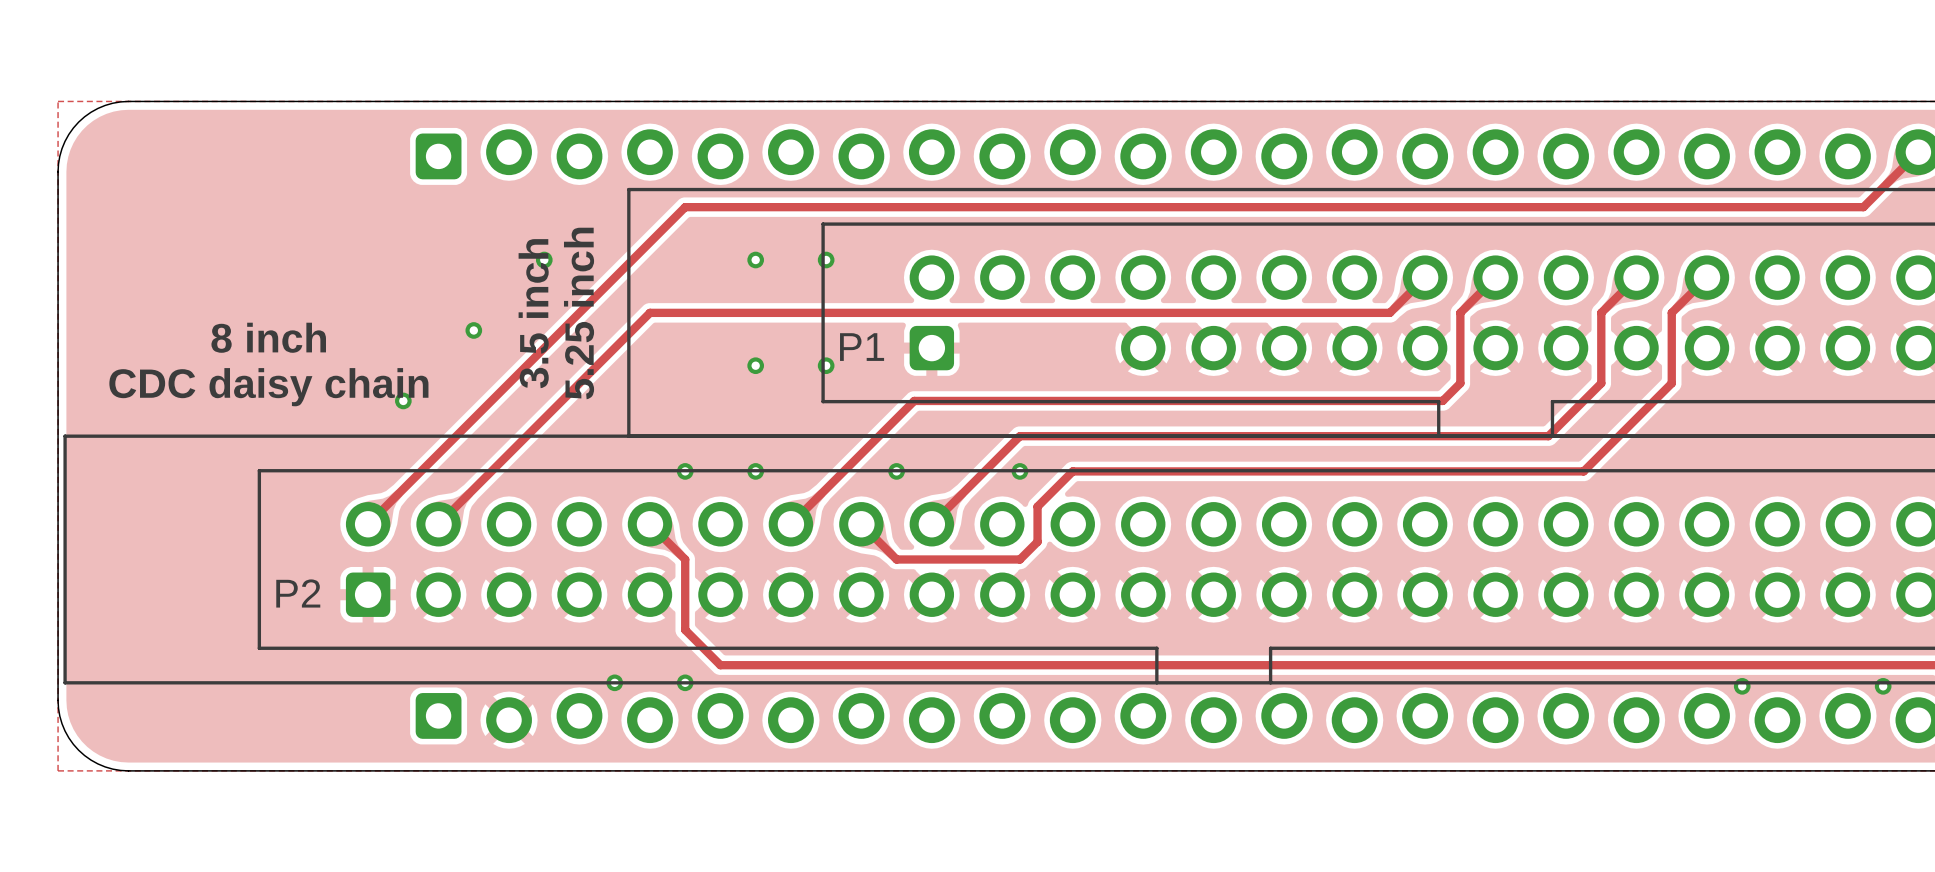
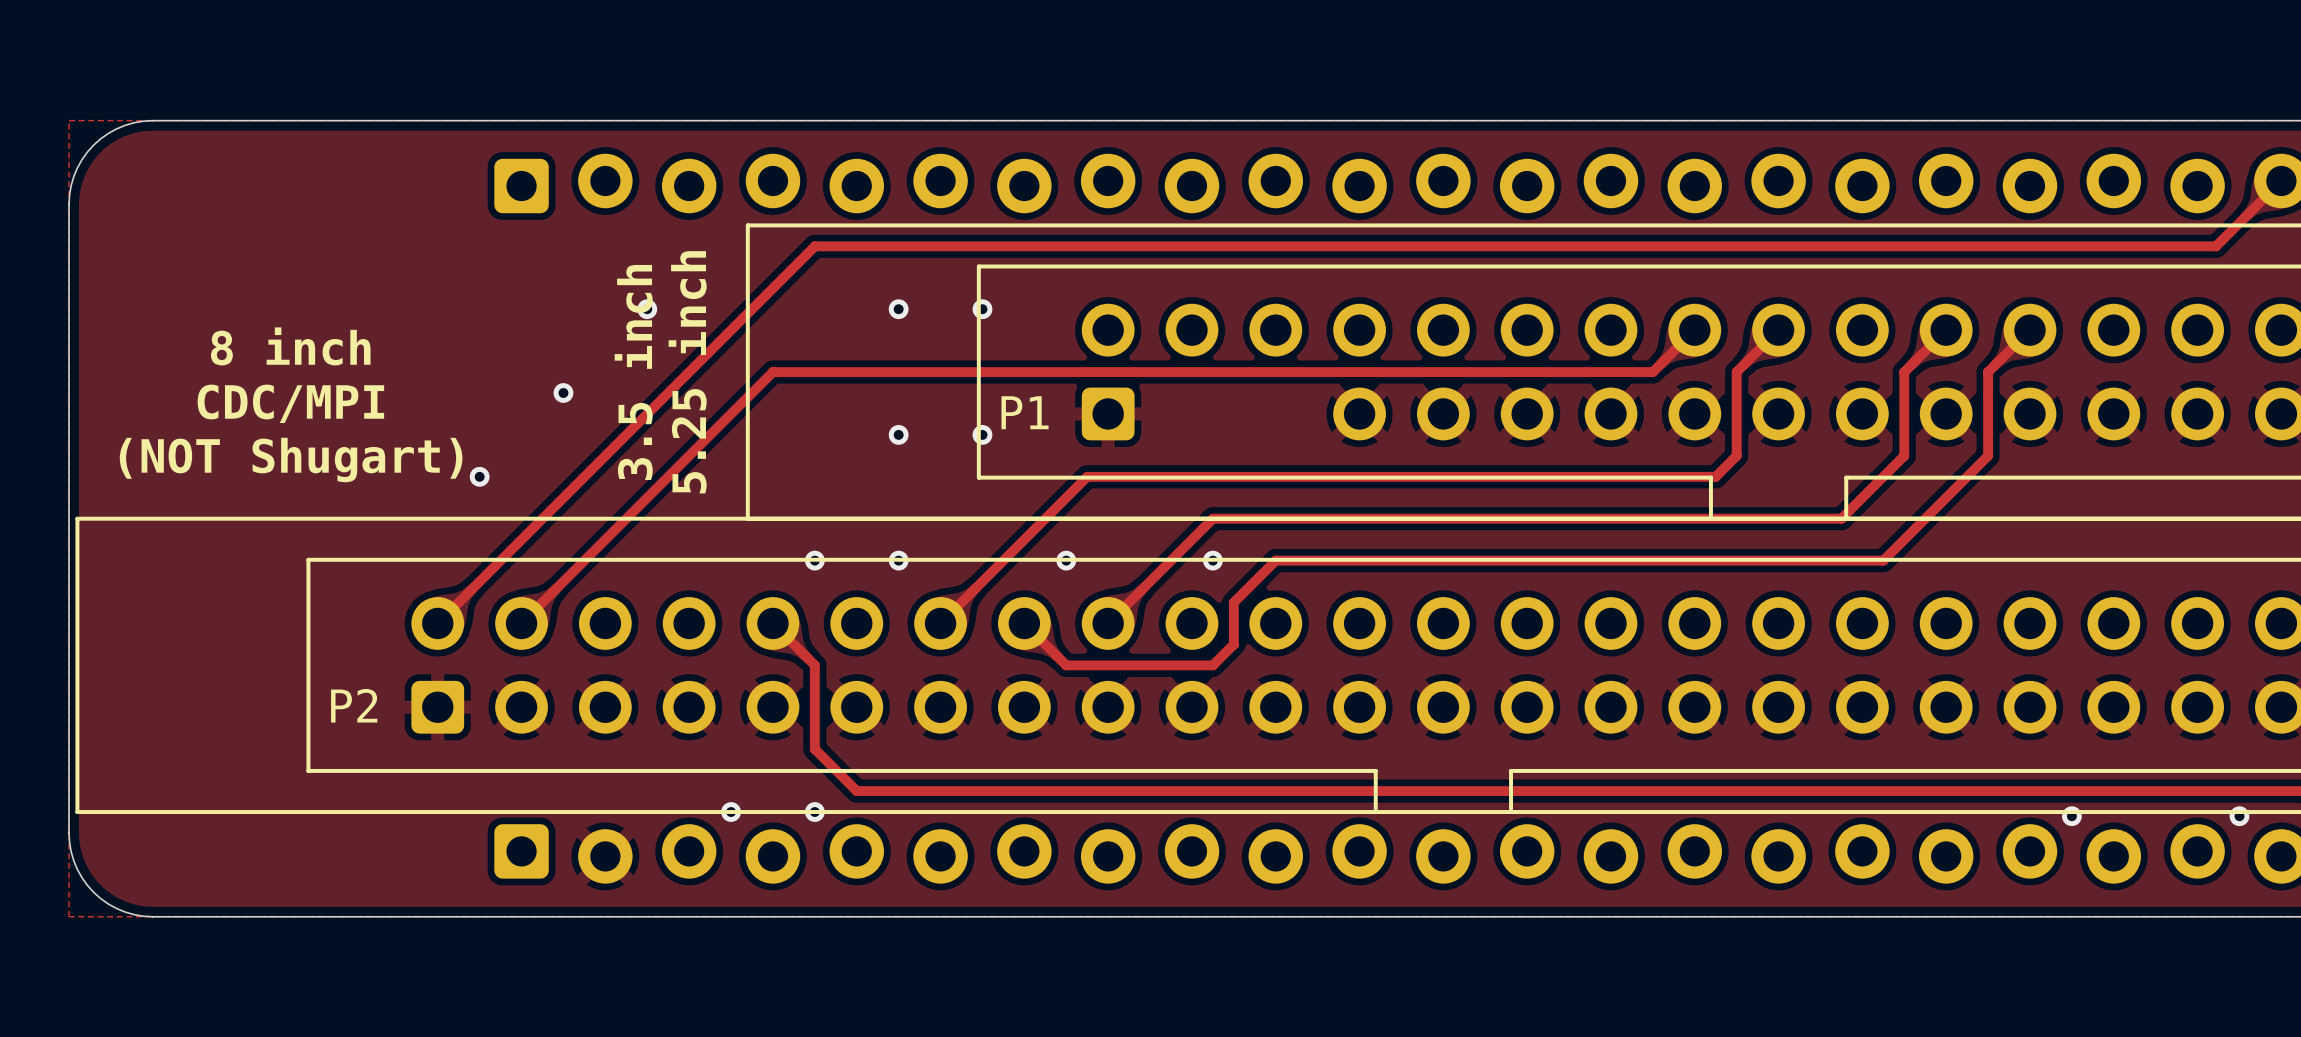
text: none -> CDC/MPI (290, 403)
text position: 8 inch (268, 337) -> 8 inch (290, 346)
text: CDC daisy chain (268, 387) -> (NOT Shugart) (291, 460)

